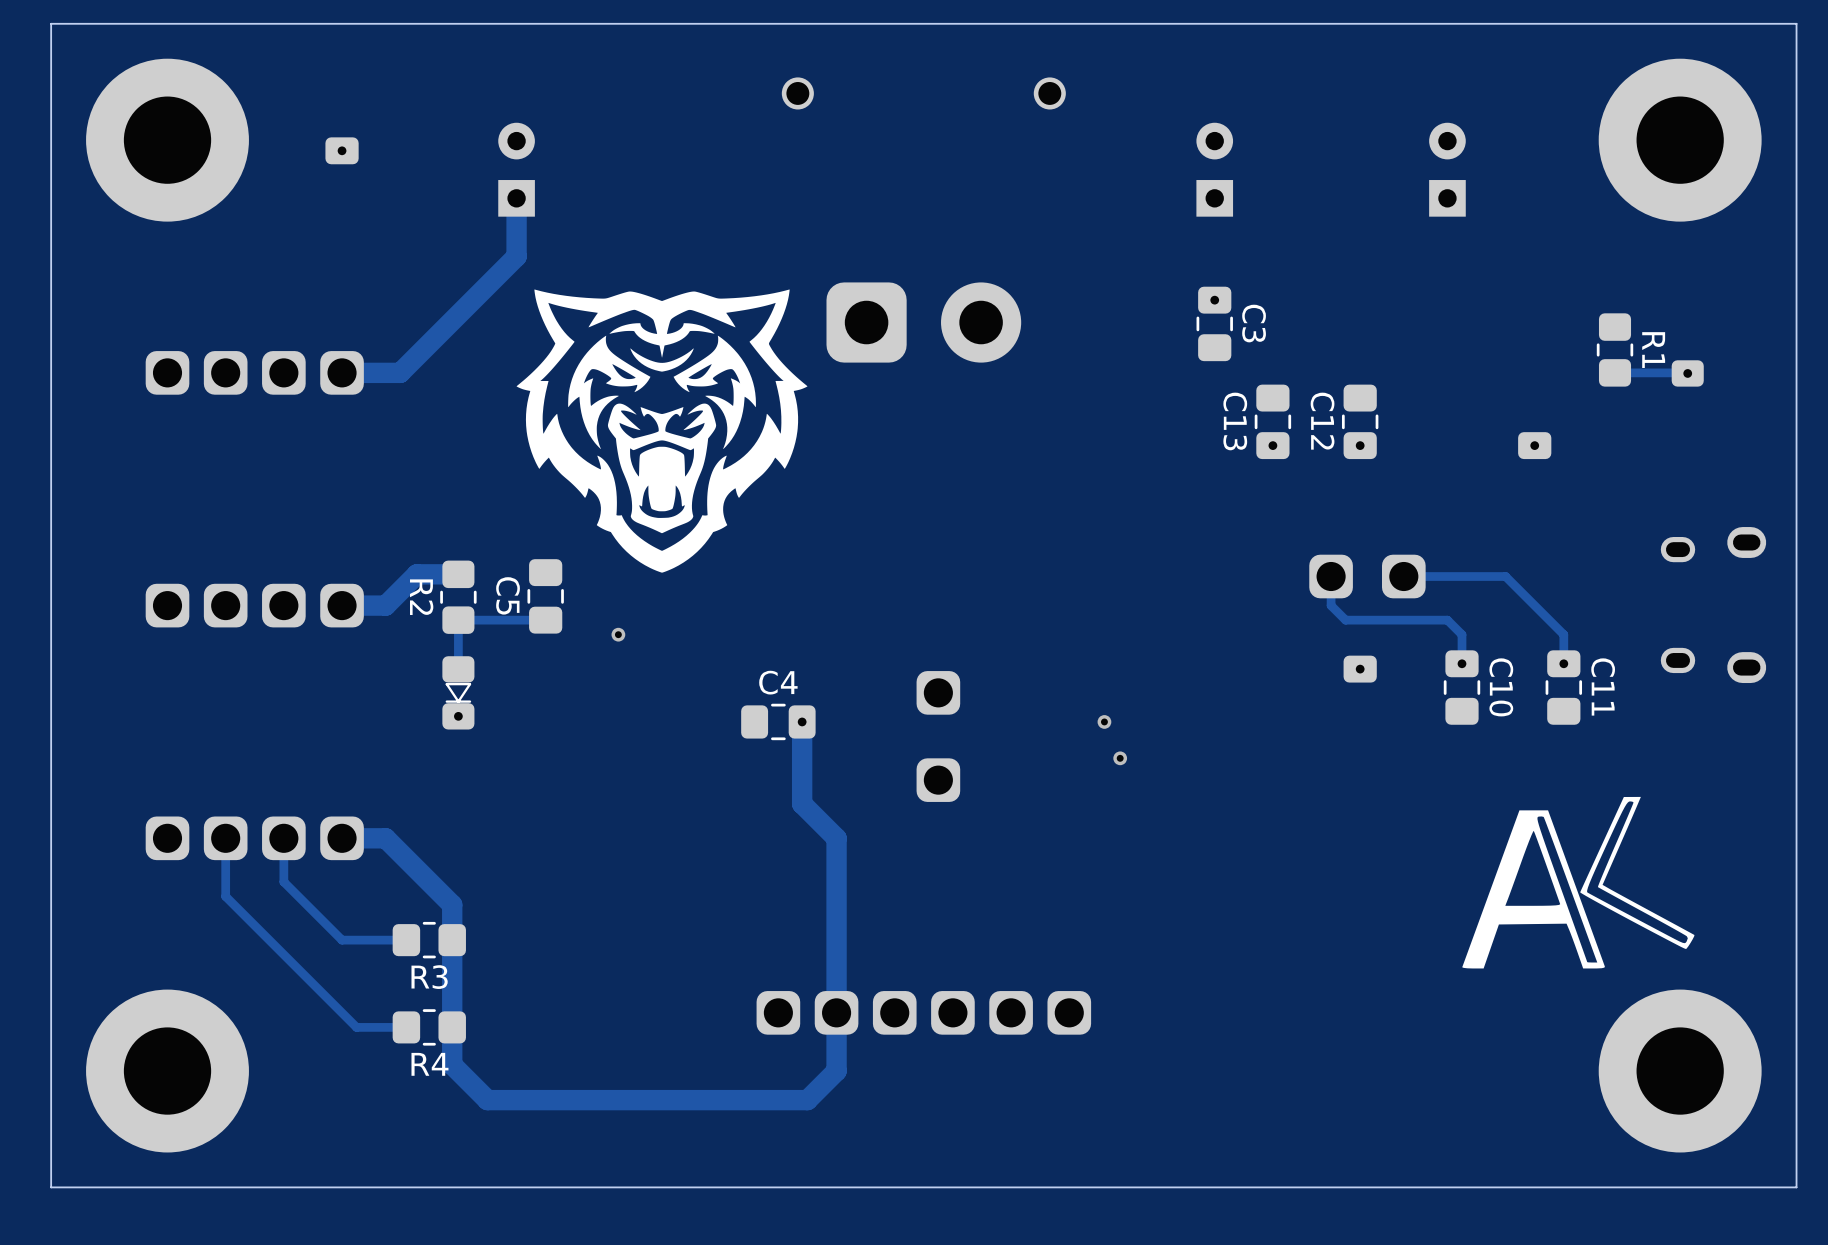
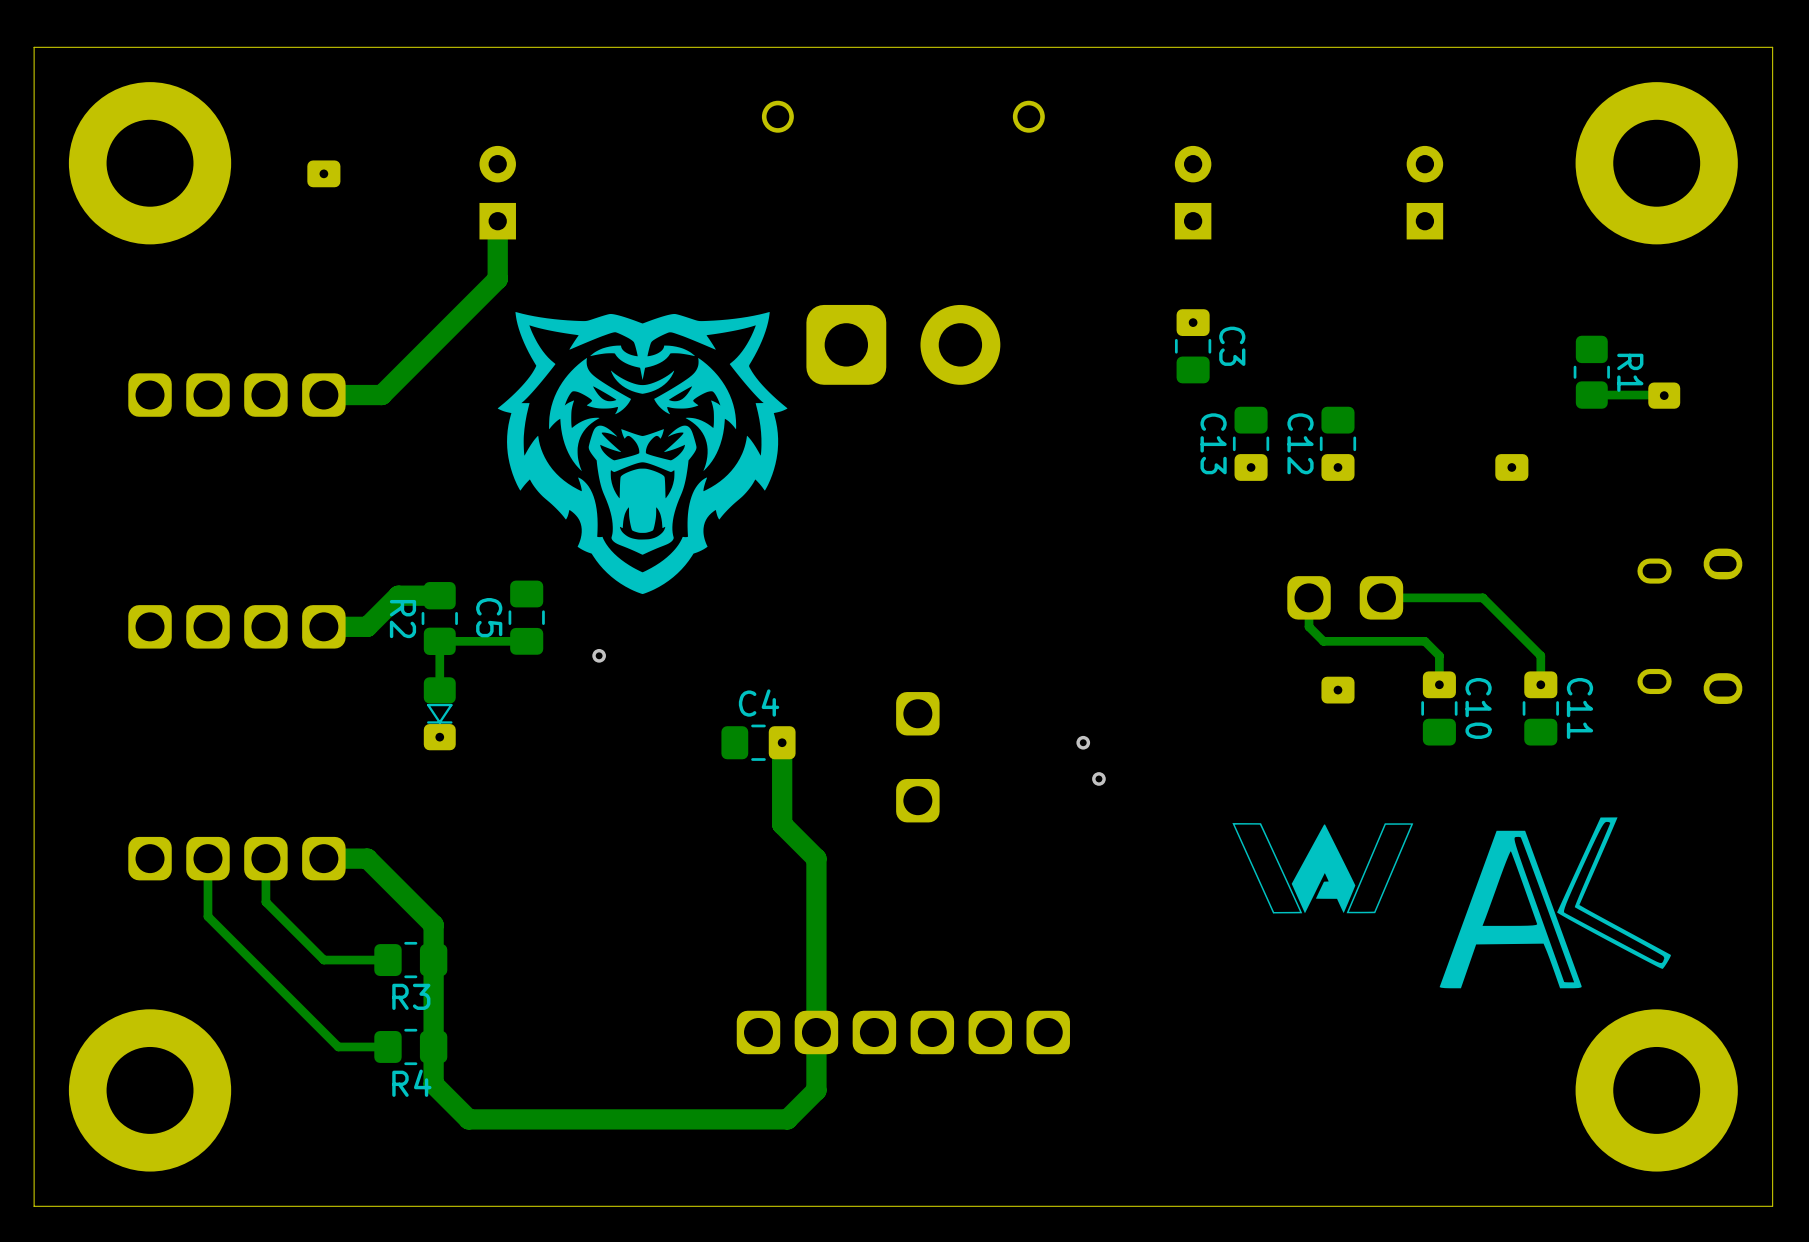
drawing: none -> [1232, 823, 1414, 914]

